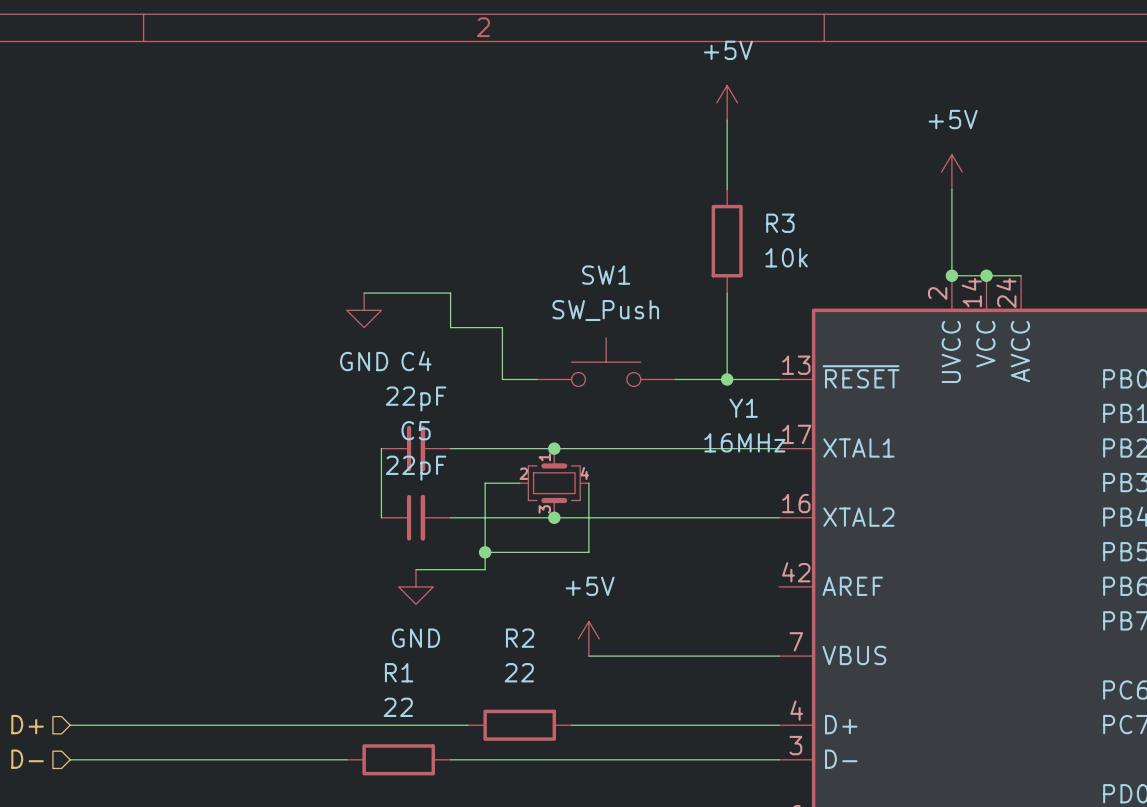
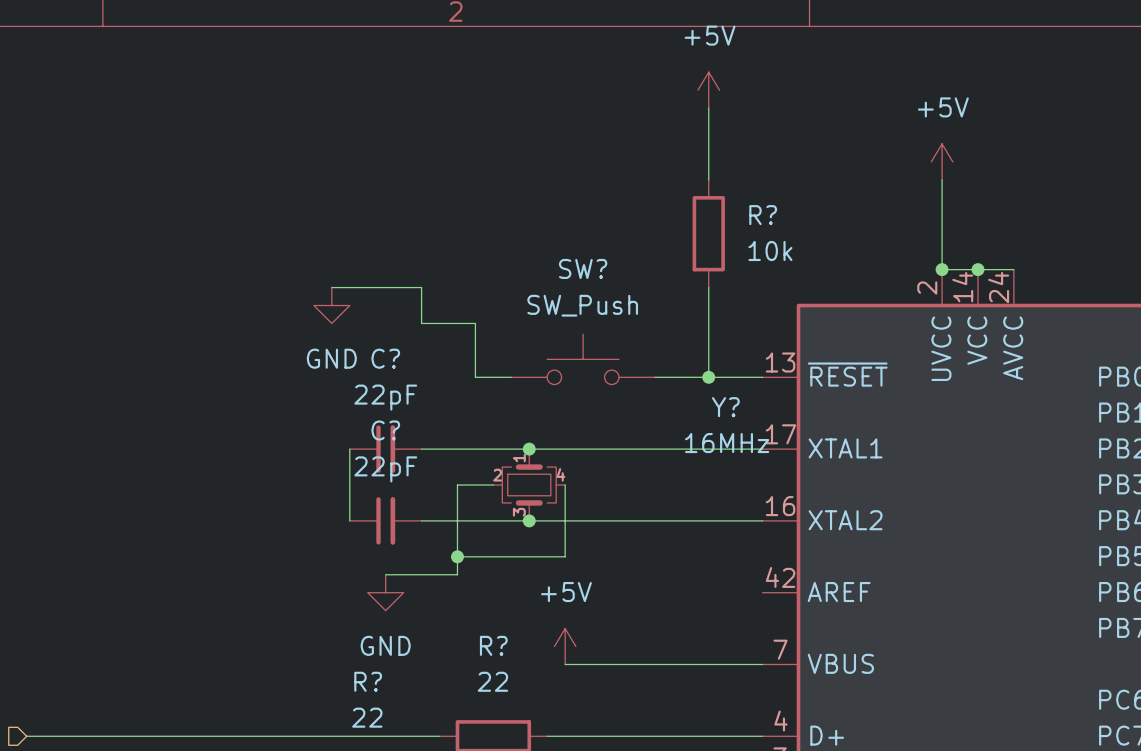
R3 name: R3 (780, 223) -> R? (763, 215)
SW1 name: SW1 (606, 275) -> SW? (583, 268)
C4 name: C4 (416, 361) -> C? (385, 358)
Y1 name: Y1 (743, 408) -> Y? (725, 407)
C5 name: C5 (416, 430) -> C? (385, 430)
R2 name: R2 (520, 638) -> R? (493, 645)
R1 name: R1 (399, 672) -> R? (368, 681)

